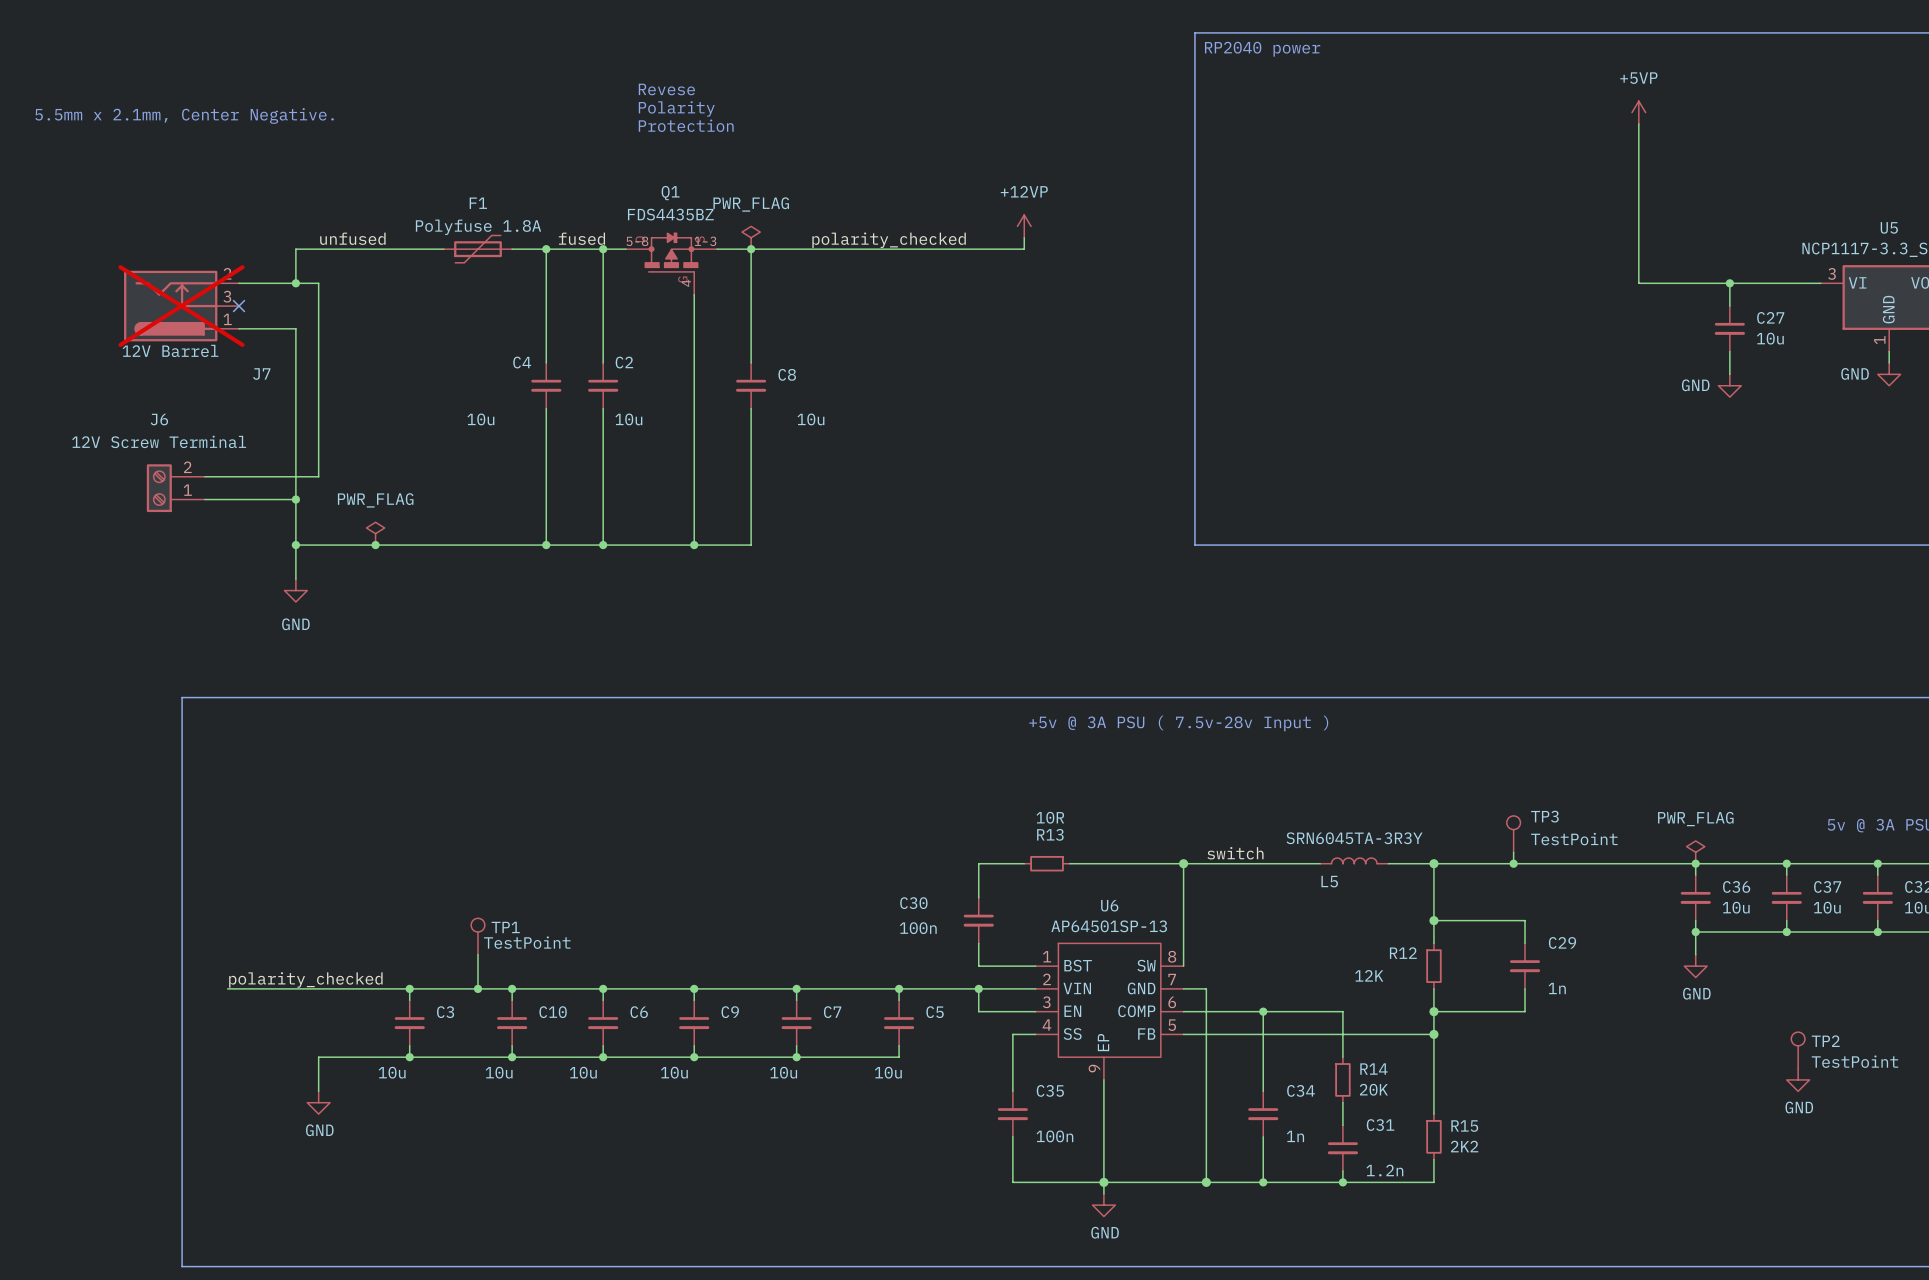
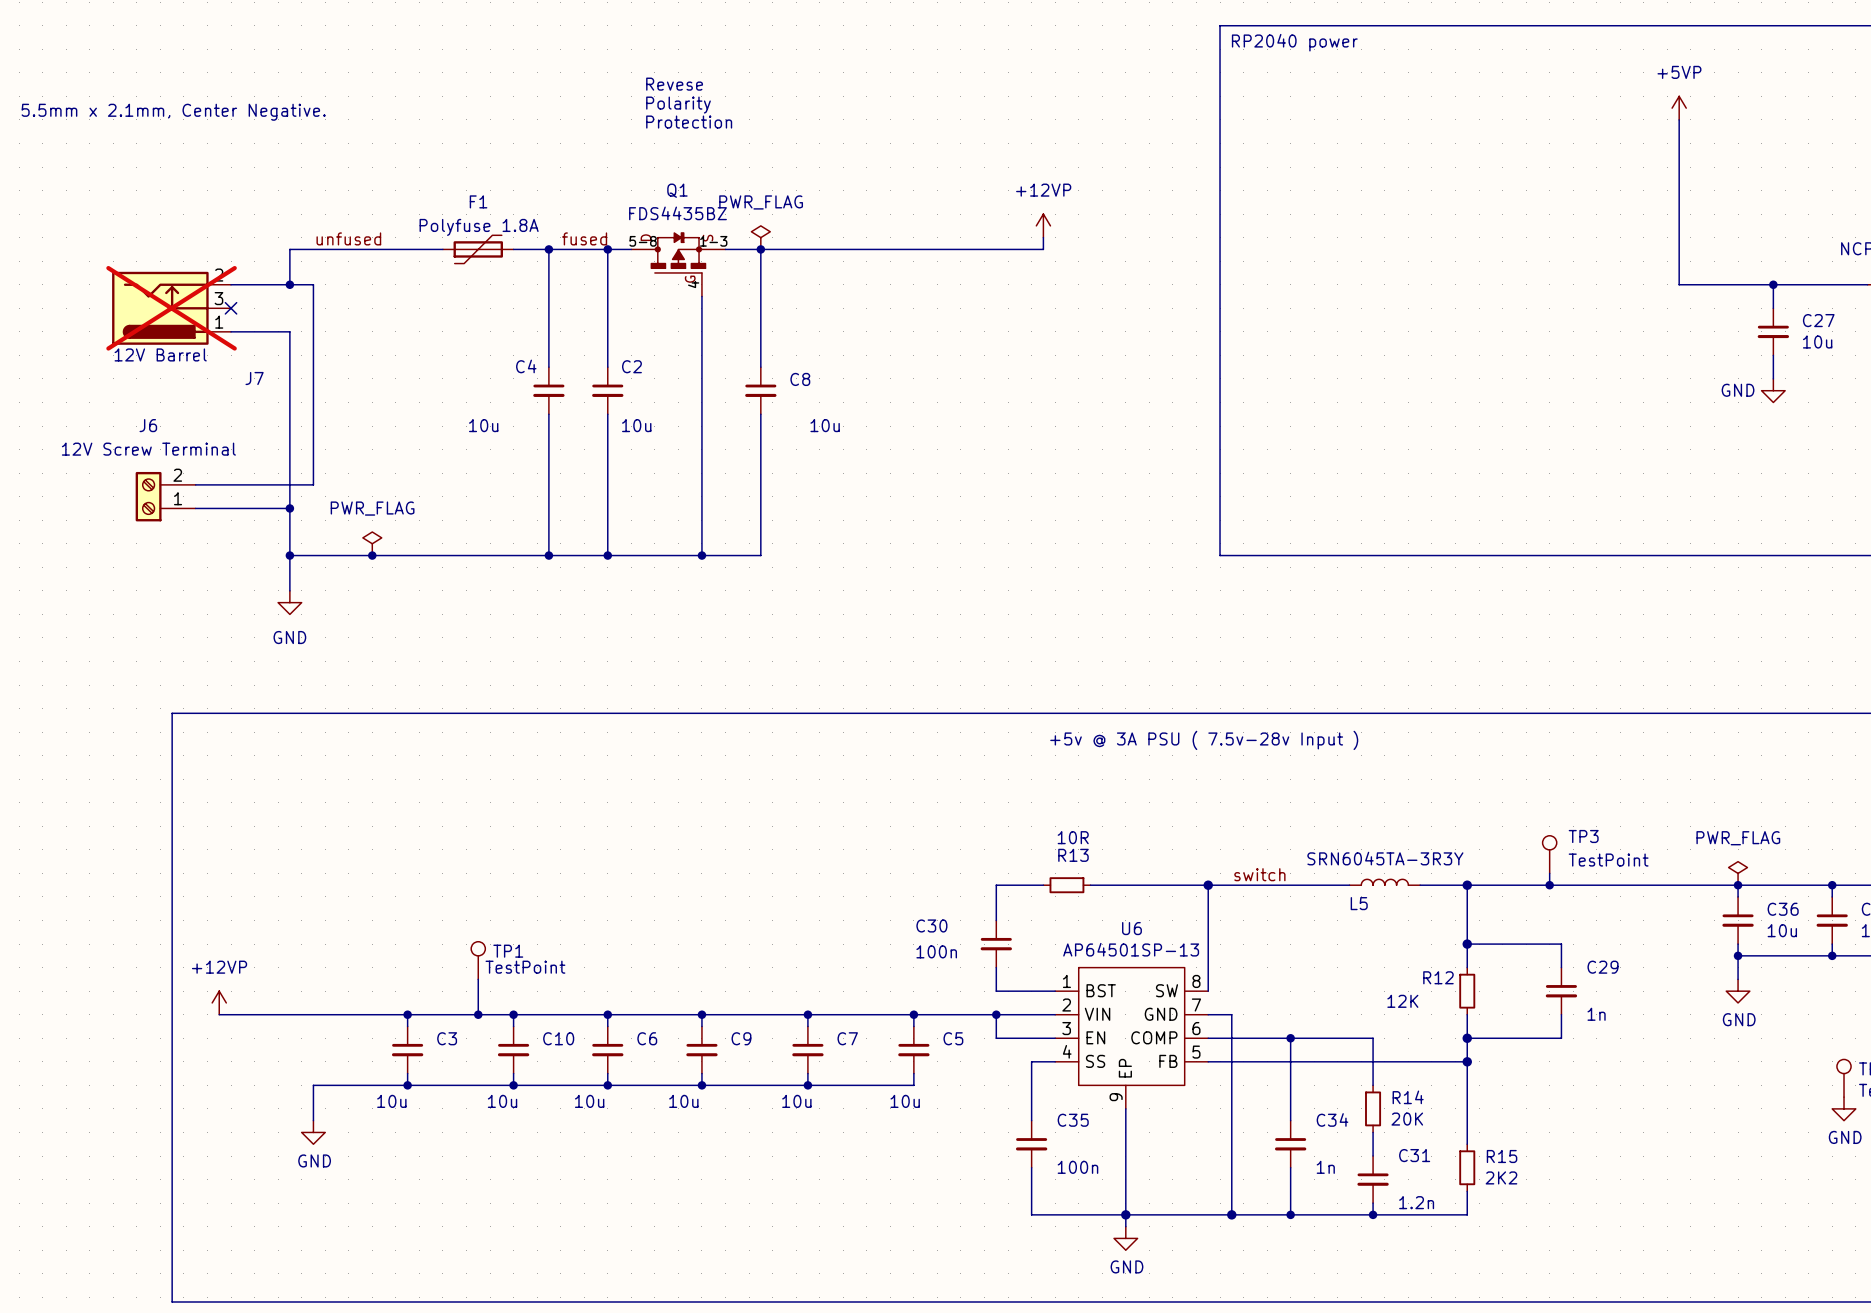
label: polarity_checked (889, 240) -> none
power symbol: none -> +12VP (219, 1002)
label: polarity_checked (305, 979) -> none

